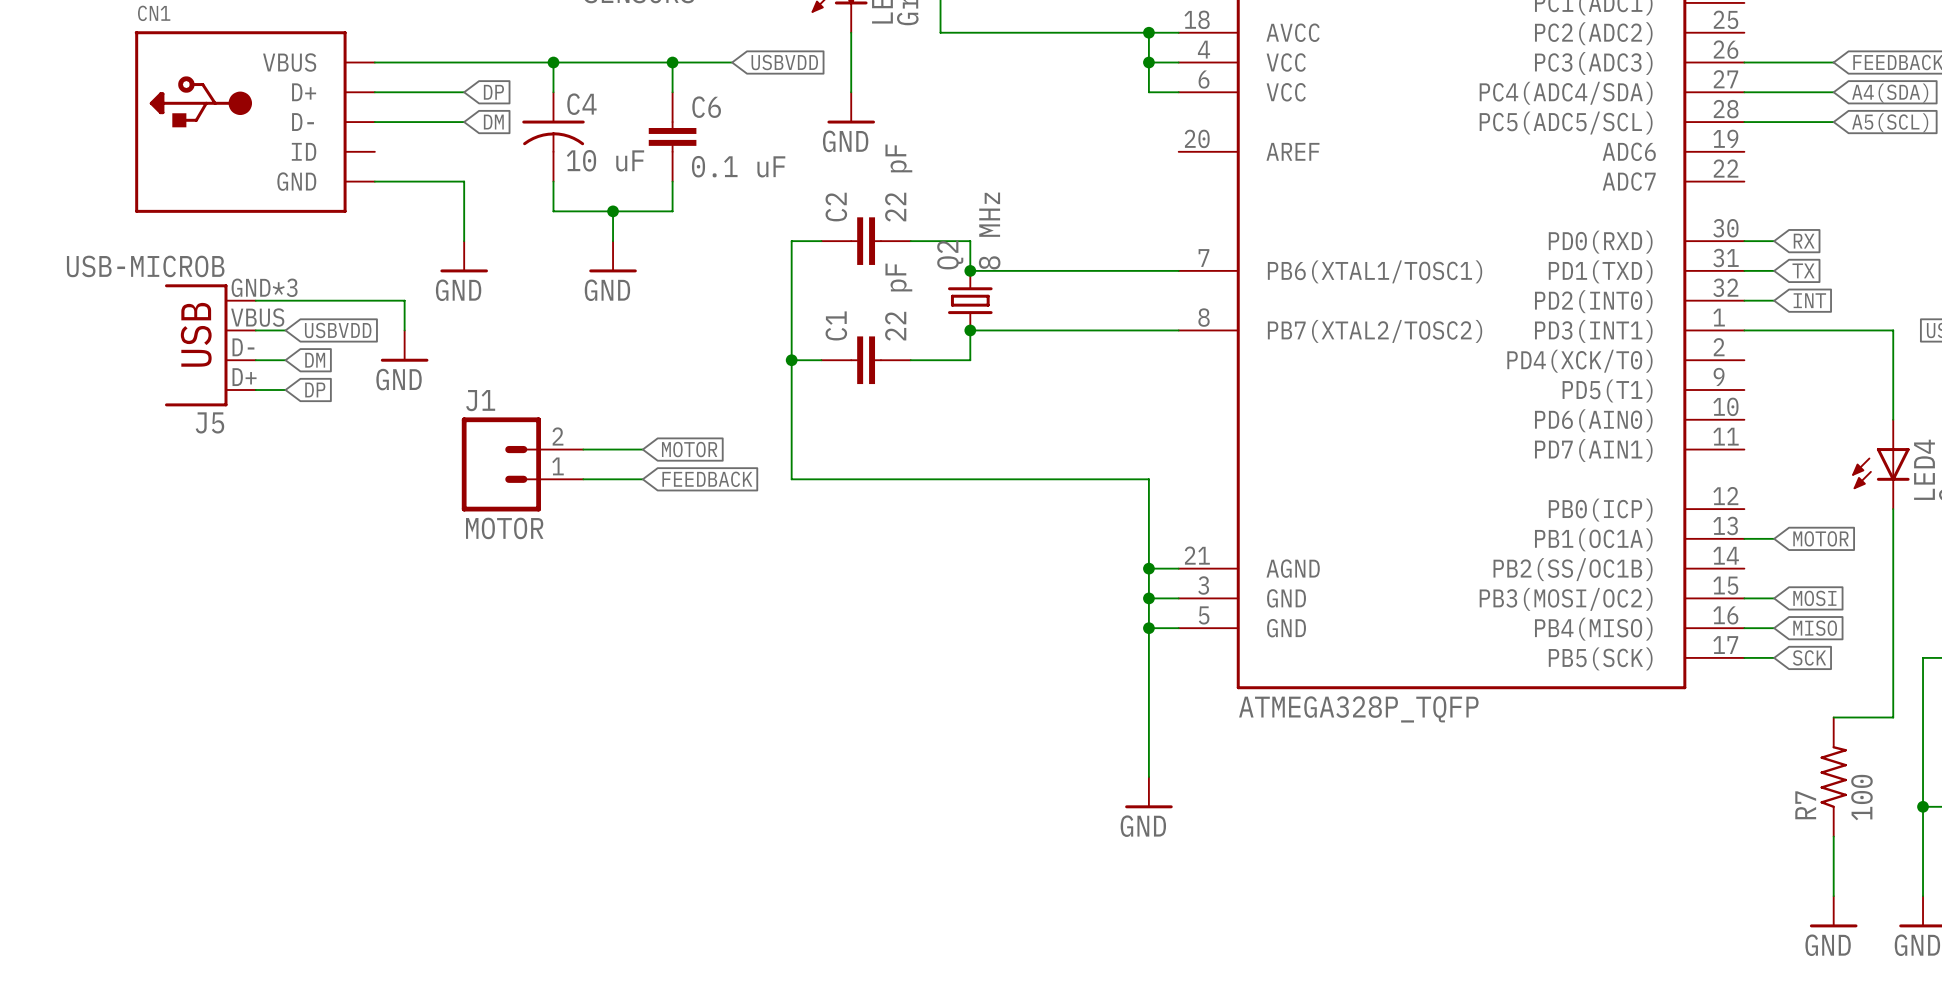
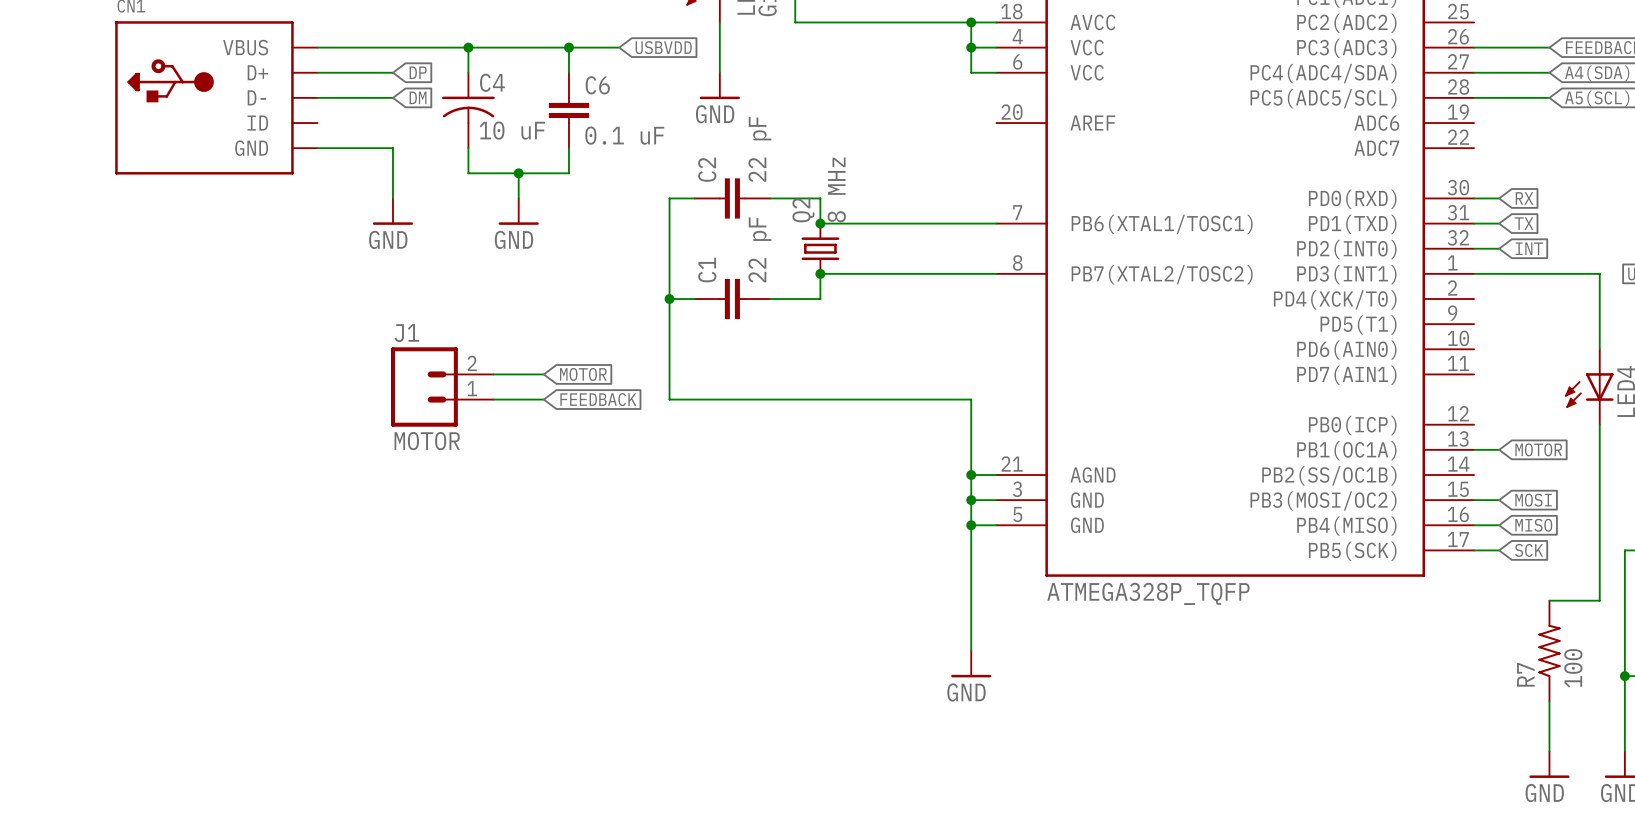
wire: (255, 300) (404, 300) (404, 330) -> none
wire: (255, 330) (285, 330) -> none
global label: USBVDD (338, 330) -> none
J5: USB-MICROB (210, 345) -> none
power symbol: GND (404, 346) -> none
wire: (255, 360) (285, 360) -> none
global label: DM (315, 360) -> none
wire: (255, 390) (285, 390) -> none
global label: DP (315, 390) -> none

